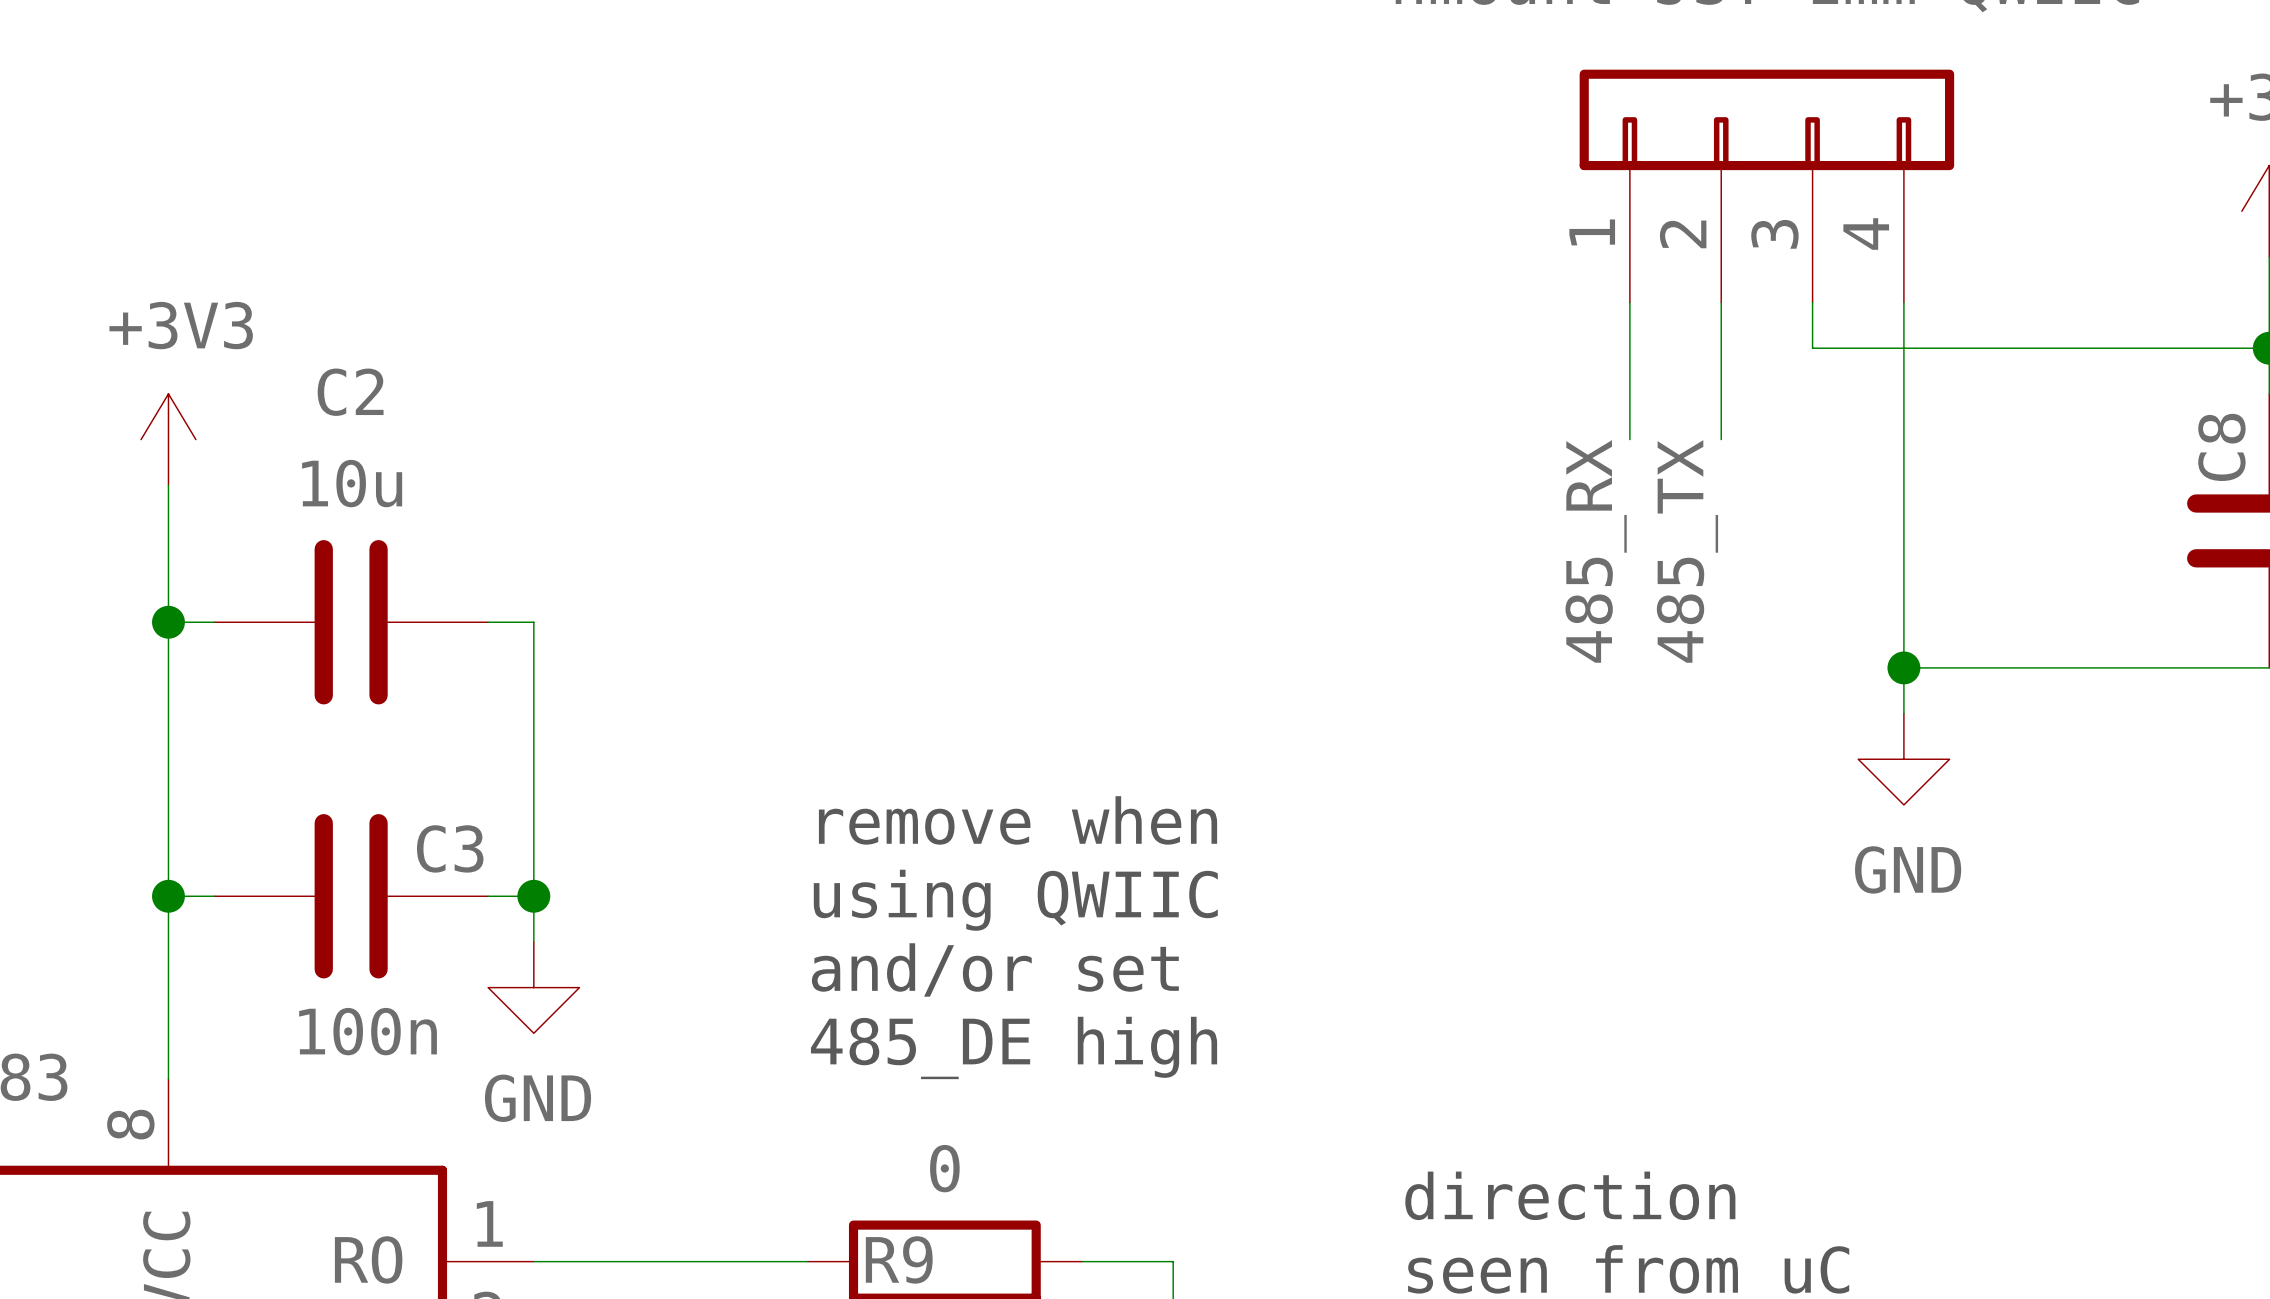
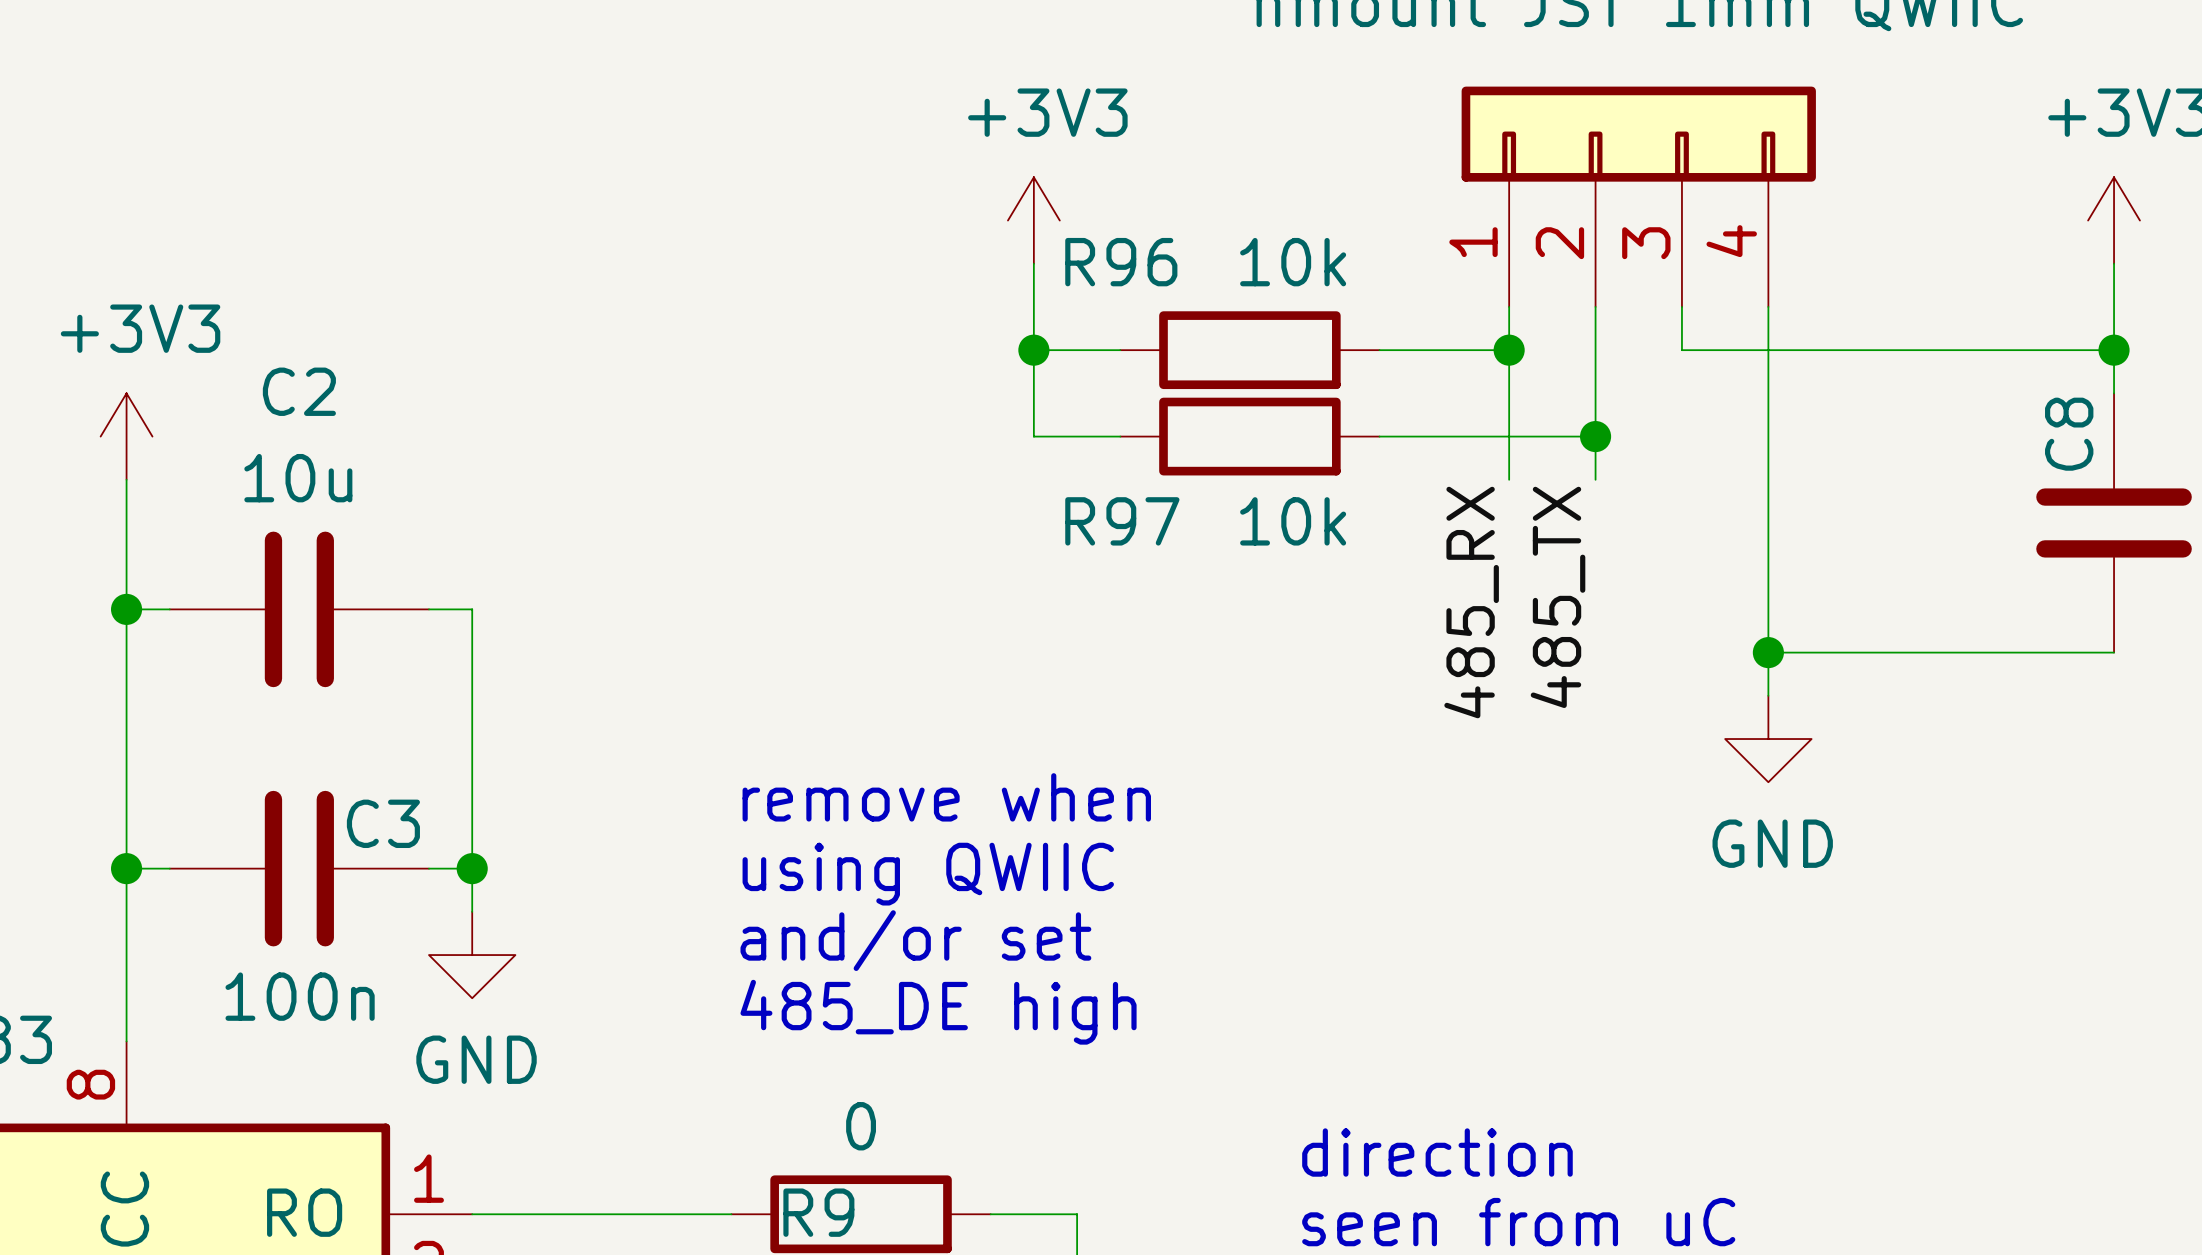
power symbol: none -> +3V3 (1033, 220)
wire: none -> (1033, 263) (1033, 436) (1120, 436)
wire: none -> (1033, 350) (1120, 350)
junction: none -> (1033, 350)
R96: none -> 10k (1249, 350)
wire: none -> (1379, 350) (1509, 350)
junction: none -> (1509, 350)
R97: none -> 10k (1249, 436)
wire: none -> (1379, 436) (1595, 436) (1595, 479)
wire: none -> (1509, 436) (1509, 479)
junction: none -> (1595, 436)
label position: 485_RX (1596, 551) -> 485_RX (1471, 602)
label position: 485_TX (1687, 551) -> 485_TX (1558, 597)

